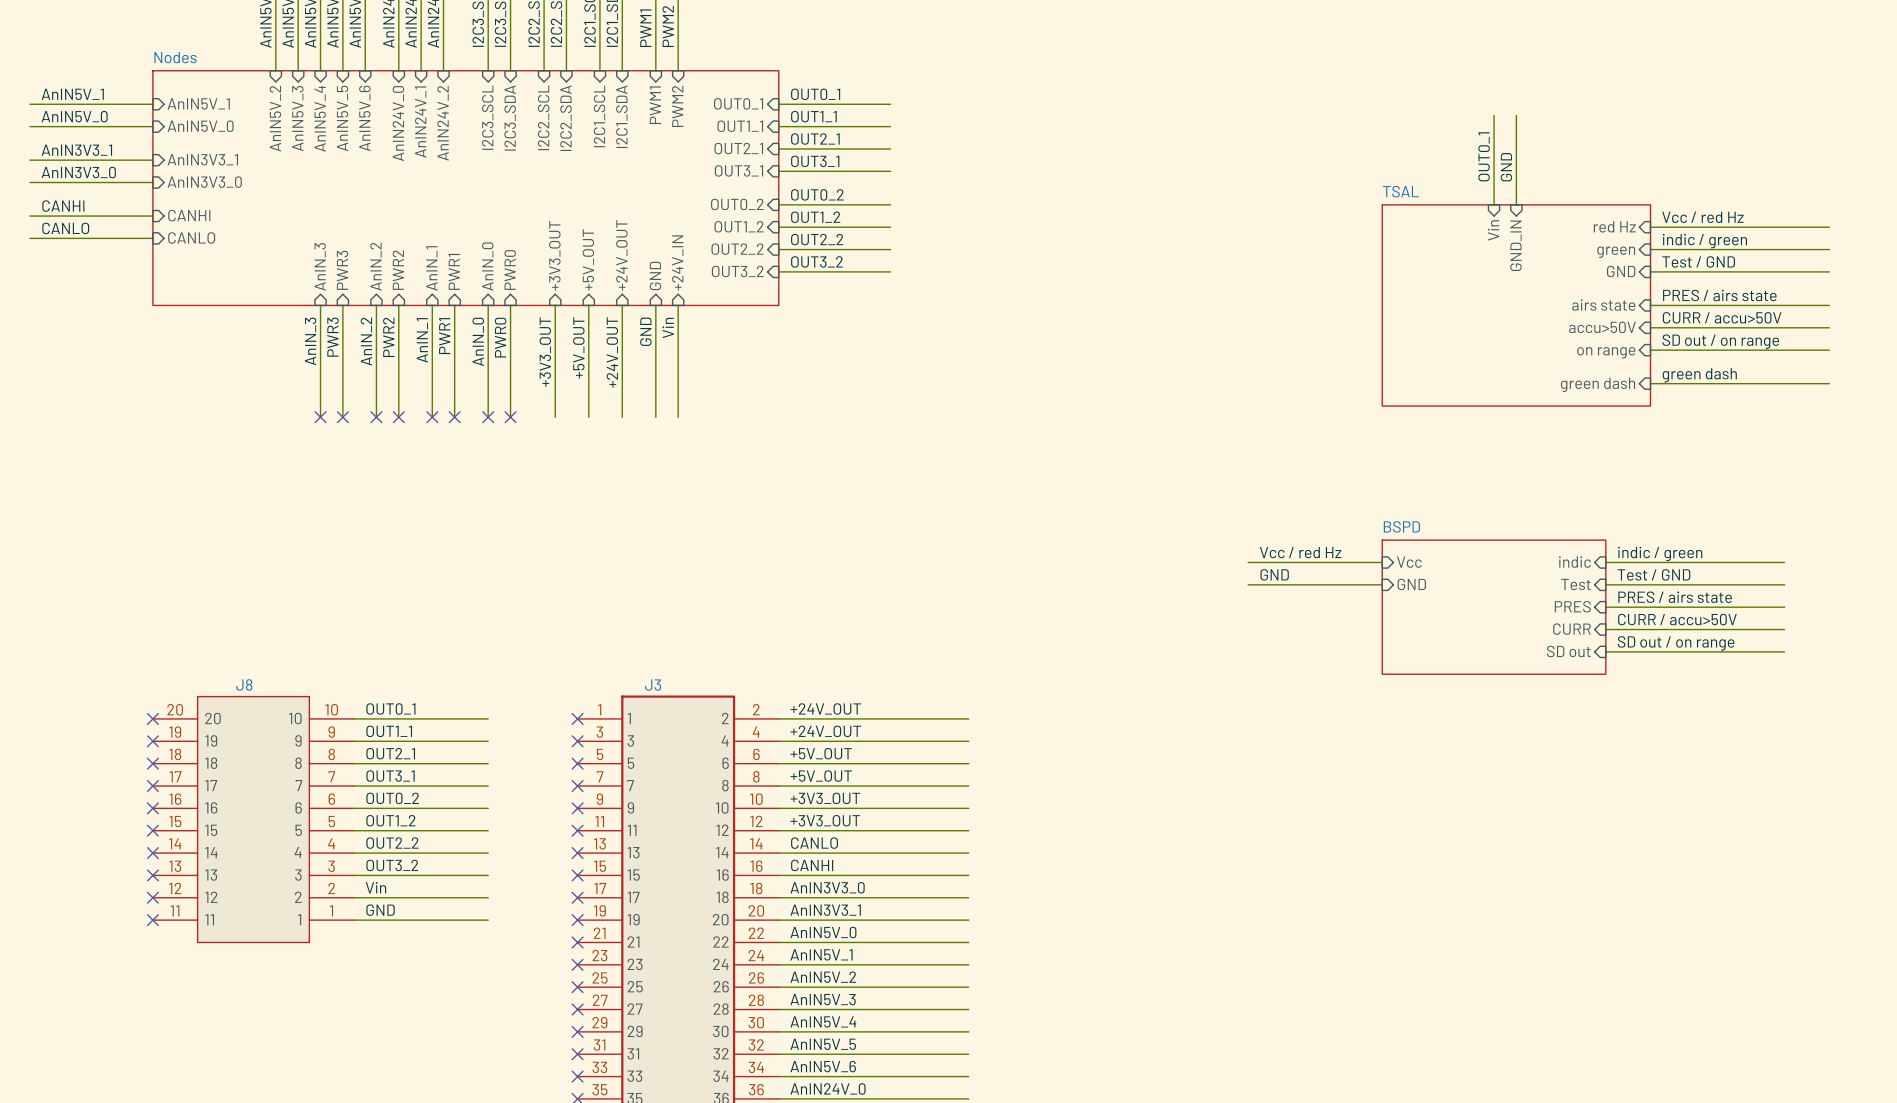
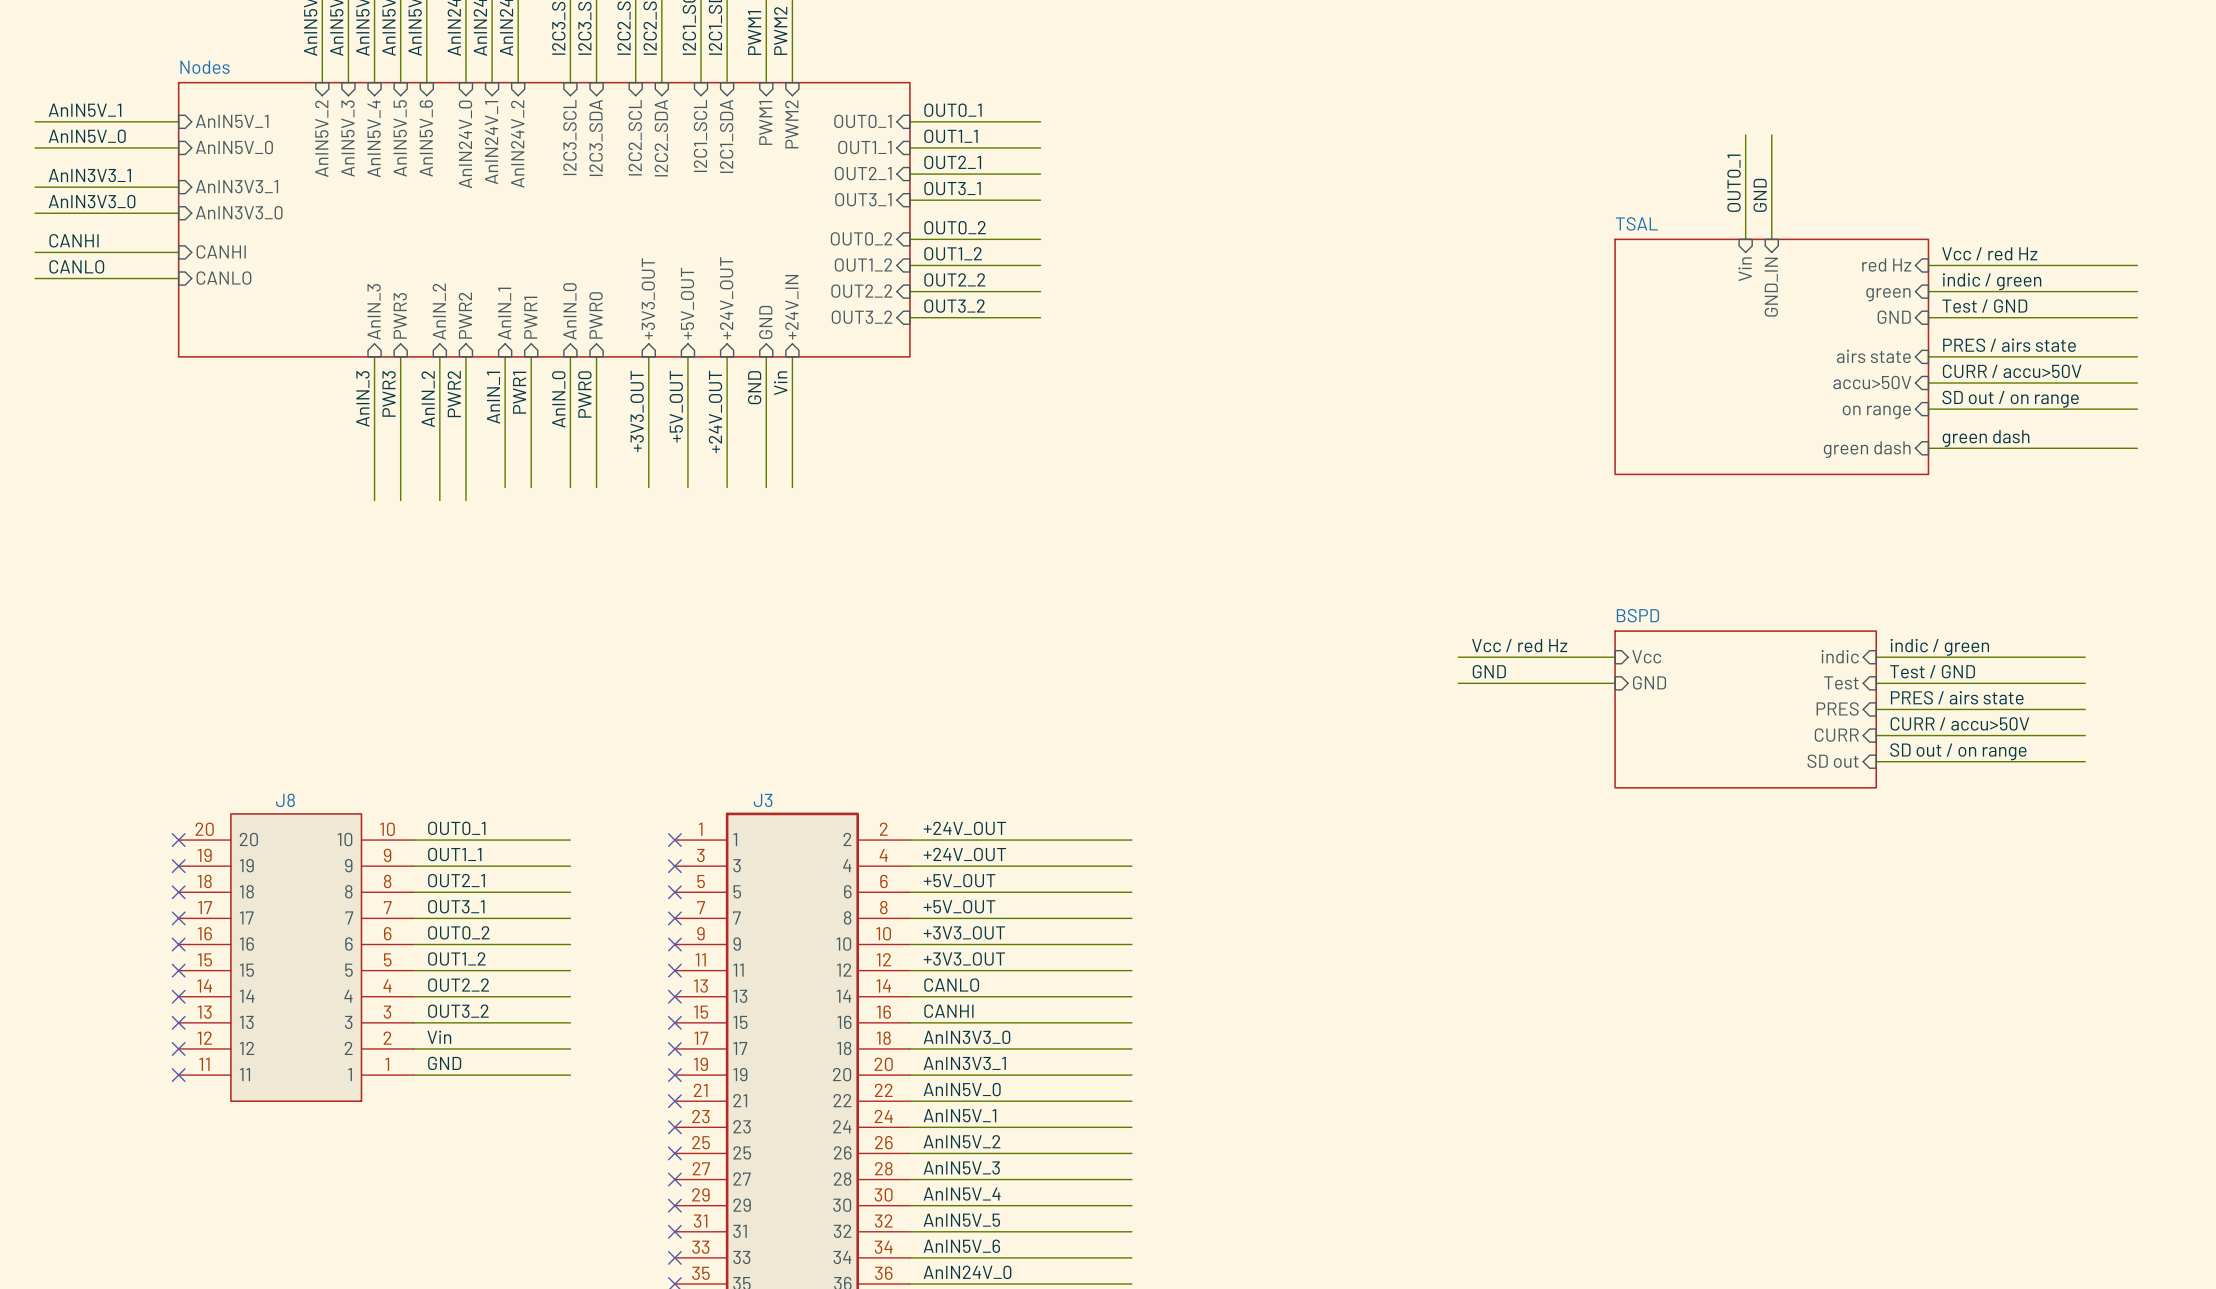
wire: none -> (374, 487) (374, 500)
no-connect mark: (320, 417) -> none
wire: none -> (400, 487) (400, 500)
no-connect mark: (342, 417) -> none
wire: none -> (439, 487) (439, 500)
no-connect mark: (376, 417) -> none
wire: none -> (465, 487) (465, 500)
no-connect mark: (398, 417) -> none
no-connect mark: (432, 417) -> none
no-connect mark: (454, 417) -> none
no-connect mark: (488, 417) -> none
no-connect mark: (510, 417) -> none

